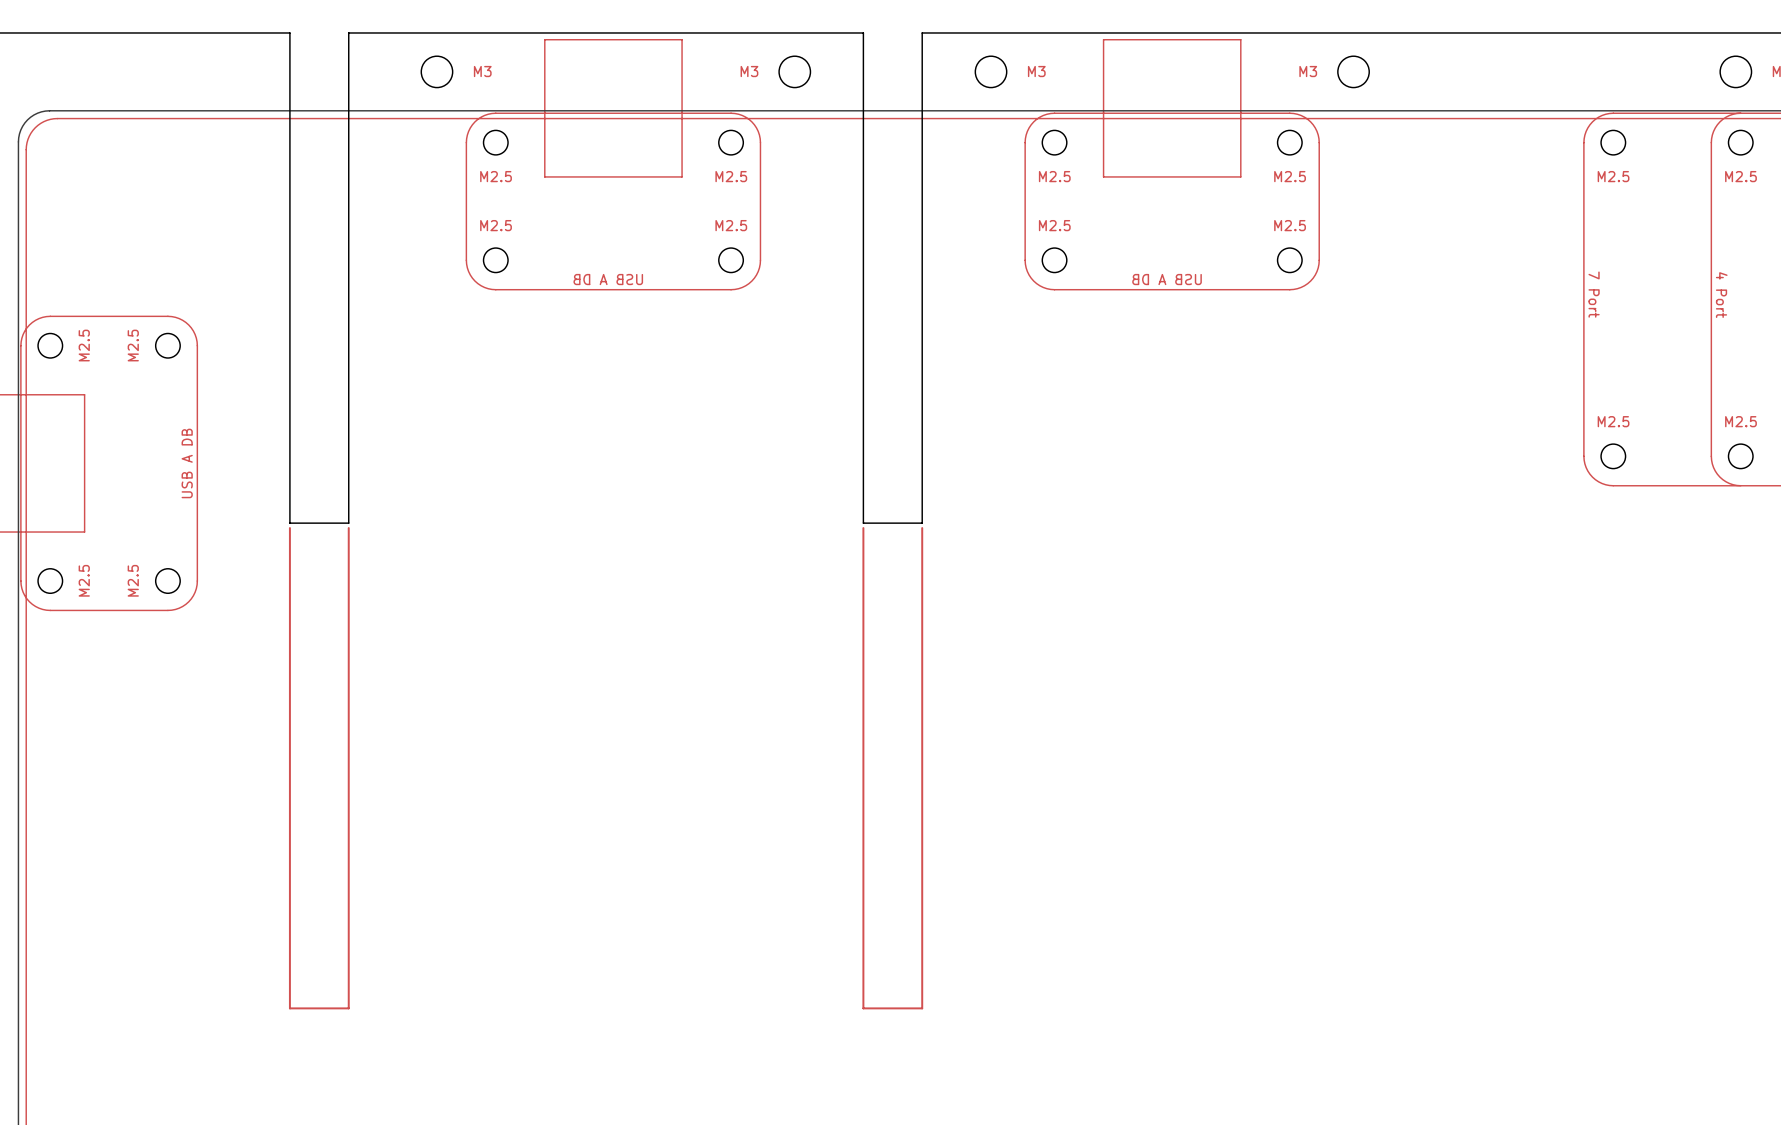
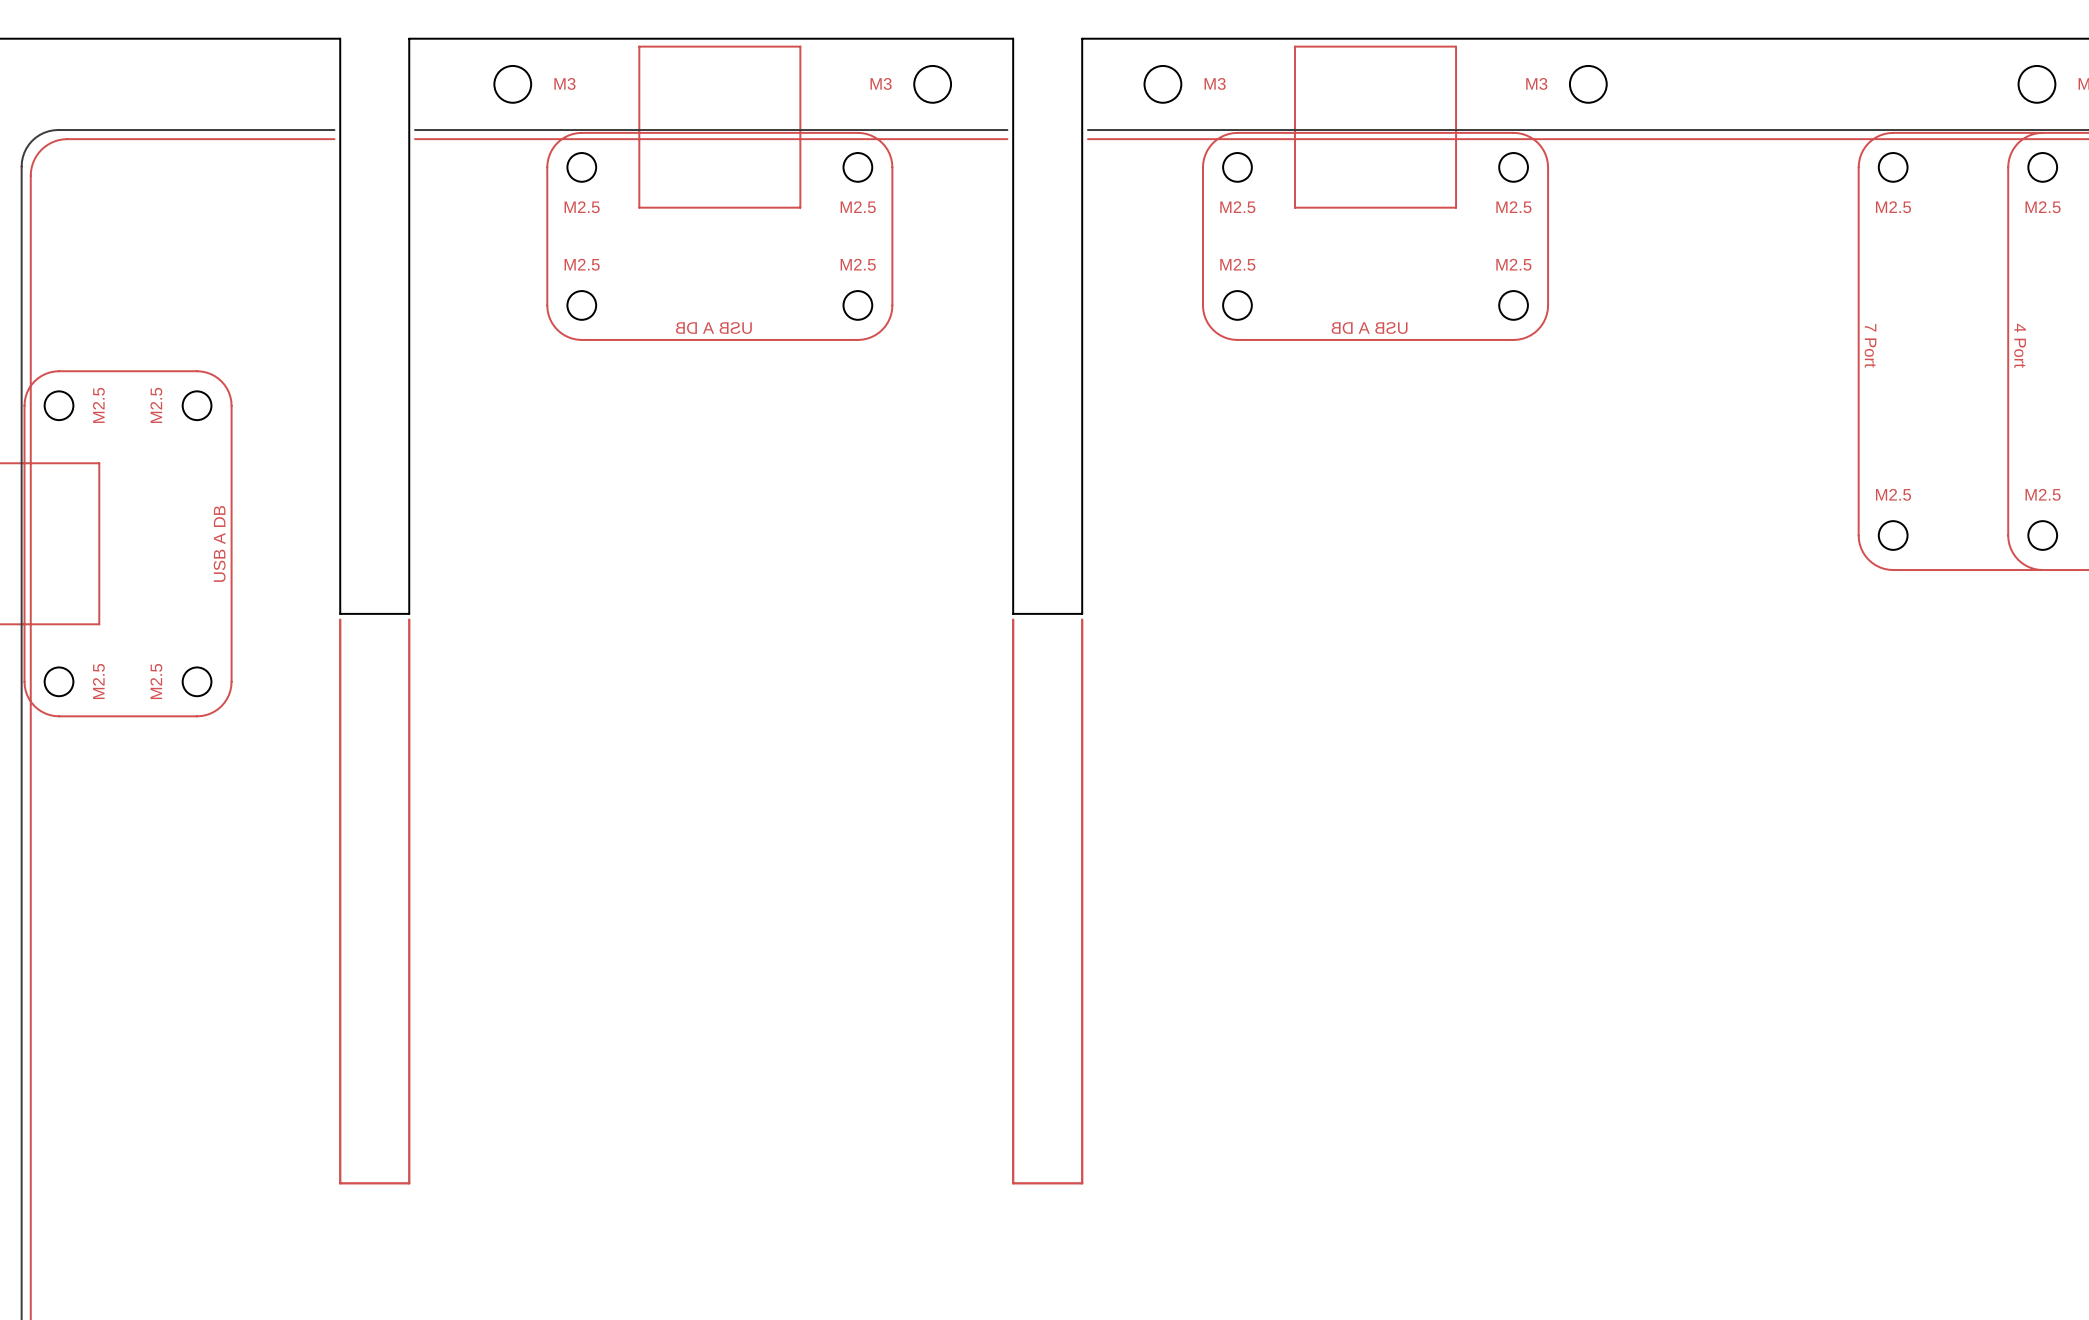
line: (285, 110) (353, 110) -> none
line: (858, 110) (927, 110) -> none
track: (285, 118) (353, 118) -> none
track: (858, 118) (927, 118) -> none

